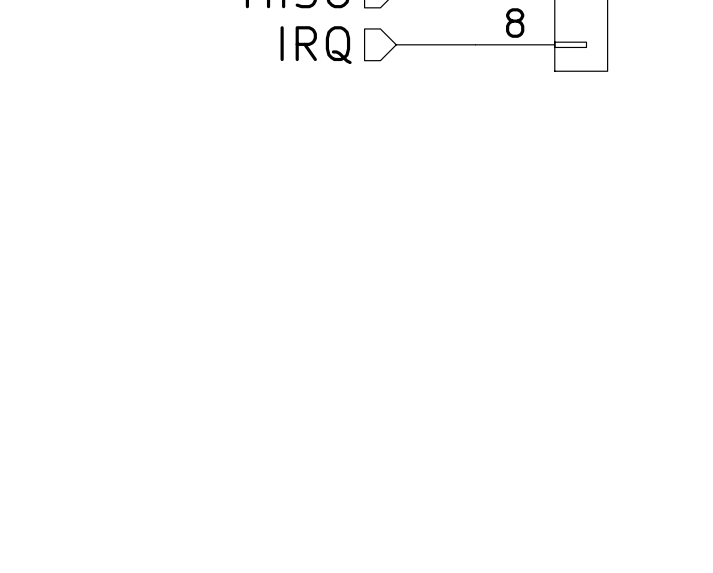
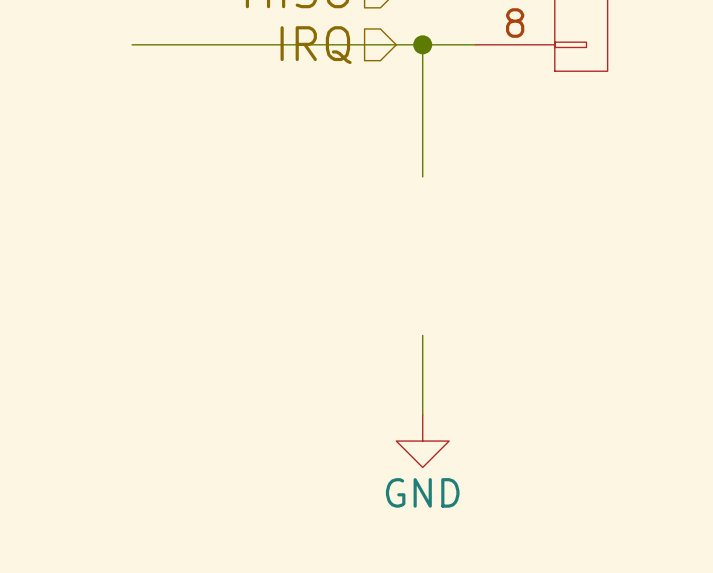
wire: none -> (132, 44) (396, 44)
wire: none -> (422, 44) (422, 176)
junction: none -> (422, 44)
wire: none -> (422, 335) (422, 414)
power symbol: none -> GND (422, 441)

